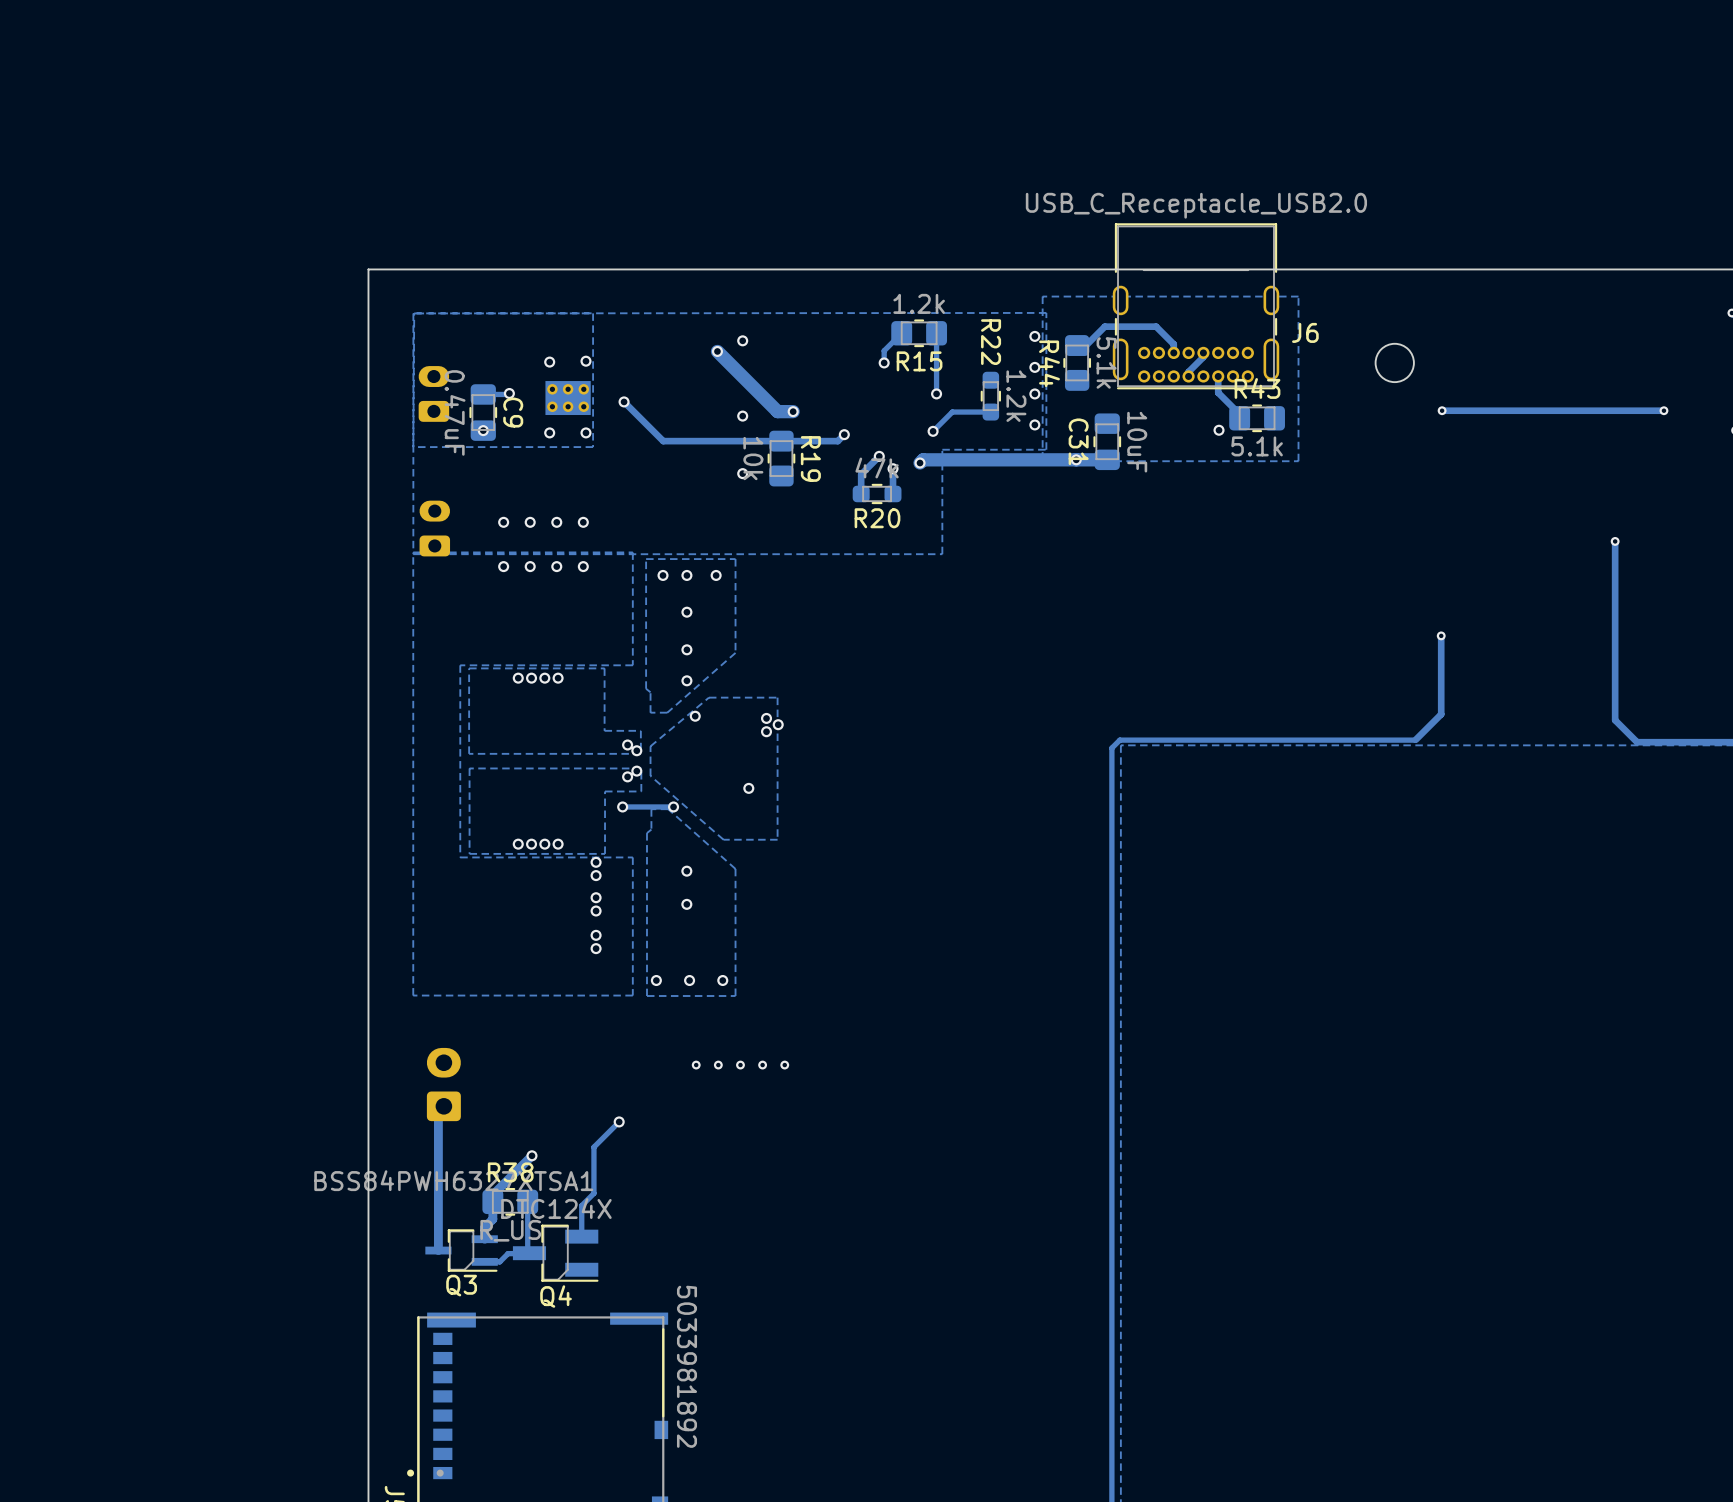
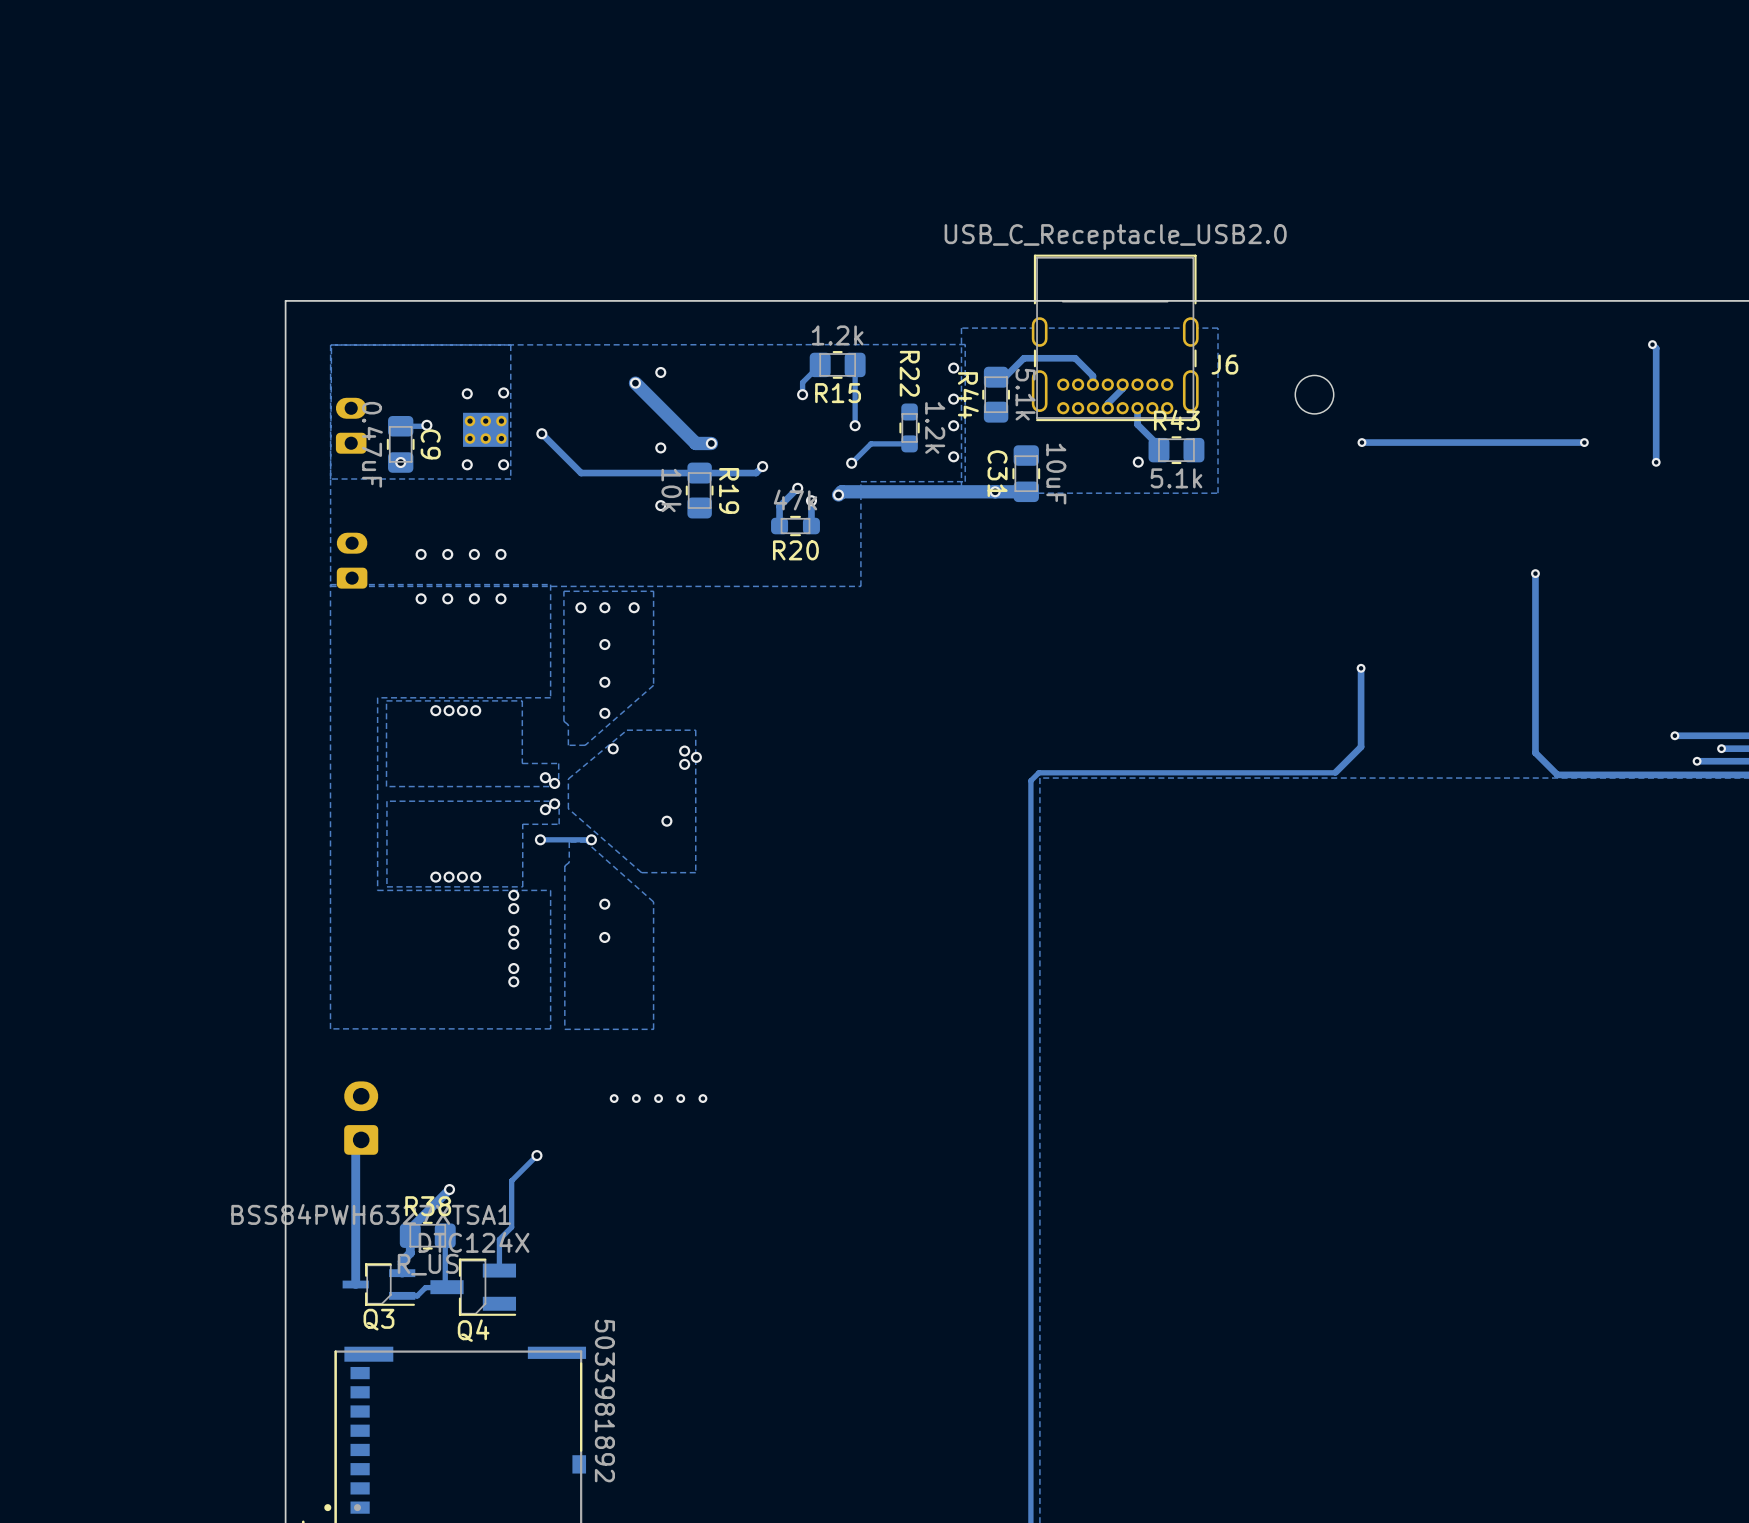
via: (656, 980) -> none
via: (689, 980) -> none
via: (722, 980) -> none

